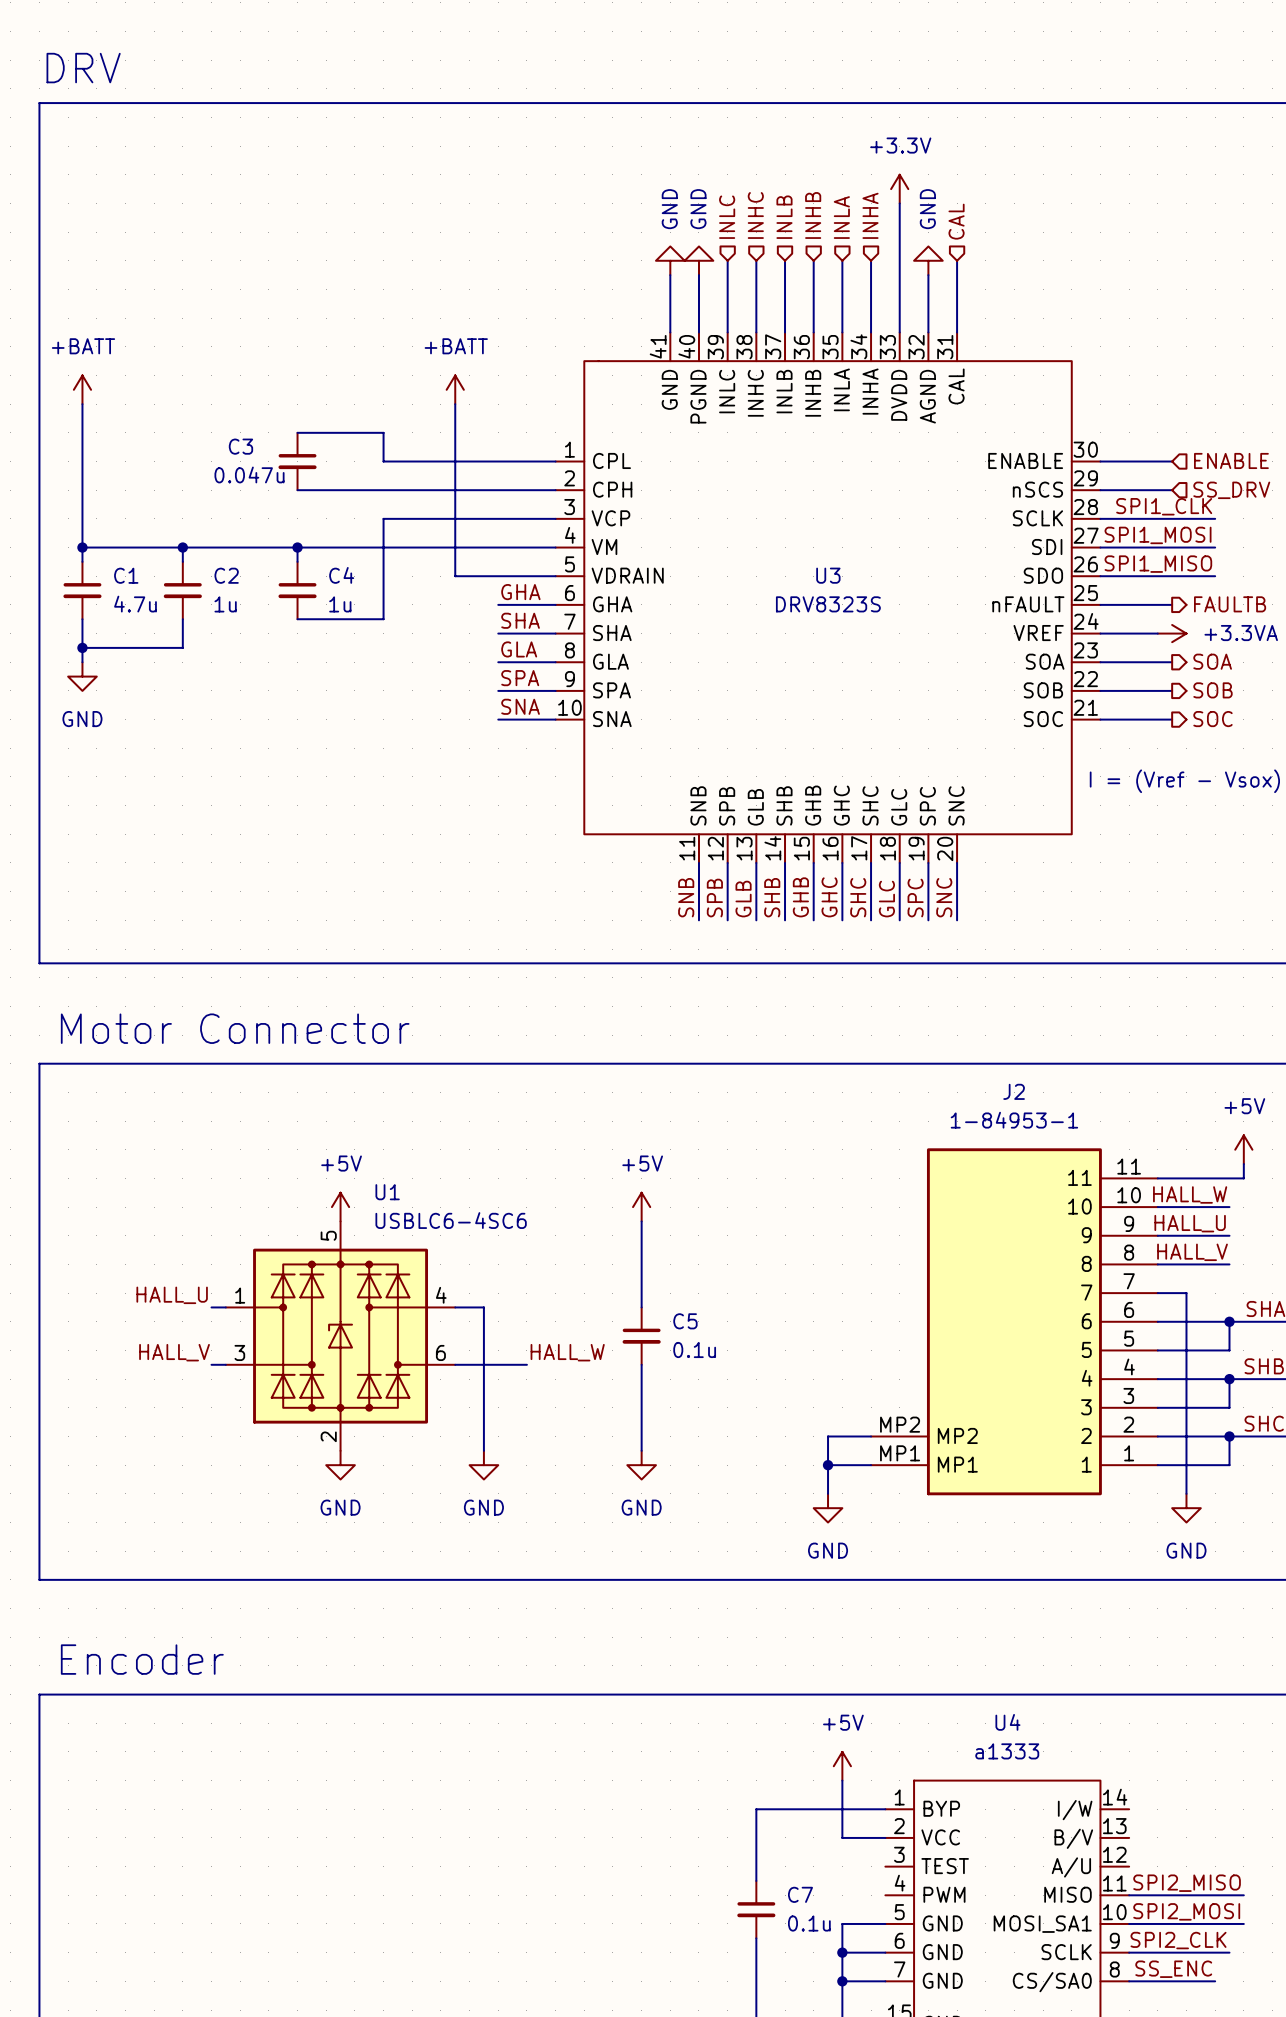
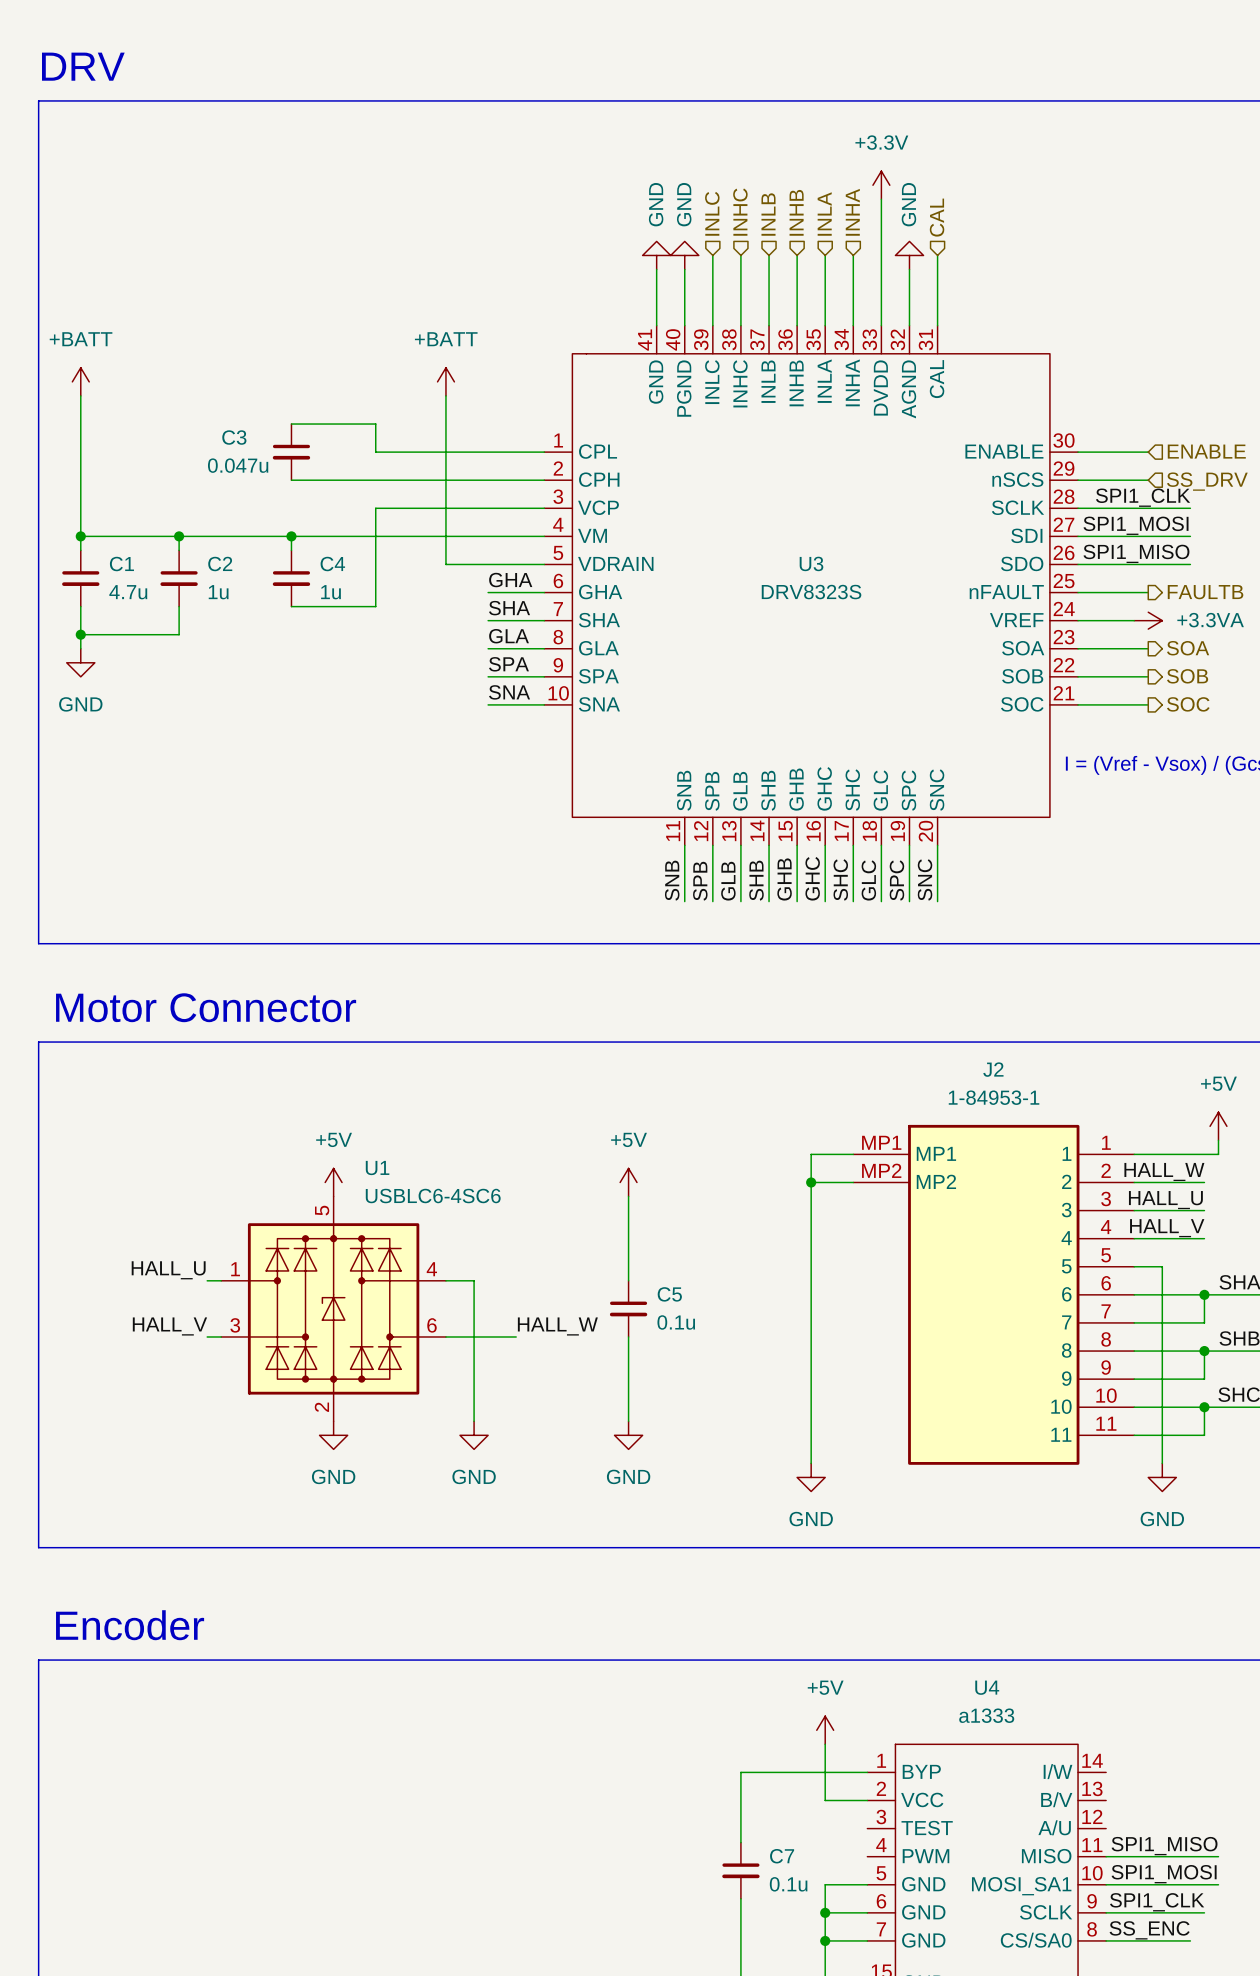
junction: none -> (811, 1182)
J2 flip: as is (1014, 1321) -> up-down (993, 1294)
wire: (828, 1436) (871, 1436) -> (811, 1407) (811, 1154) (853, 1154)
wire: (828, 1465) (871, 1465) -> (811, 1182) (853, 1182)
junction: (828, 1465) -> none
label: SPI2_MISO (1187, 1883) -> SPI1_MISO (1164, 1846)
label: SPI2_MOSI (1186, 1911) -> SPI1_MOSI (1164, 1874)
label: SPI2_CLK (1178, 1940) -> SPI1_CLK (1157, 1902)

